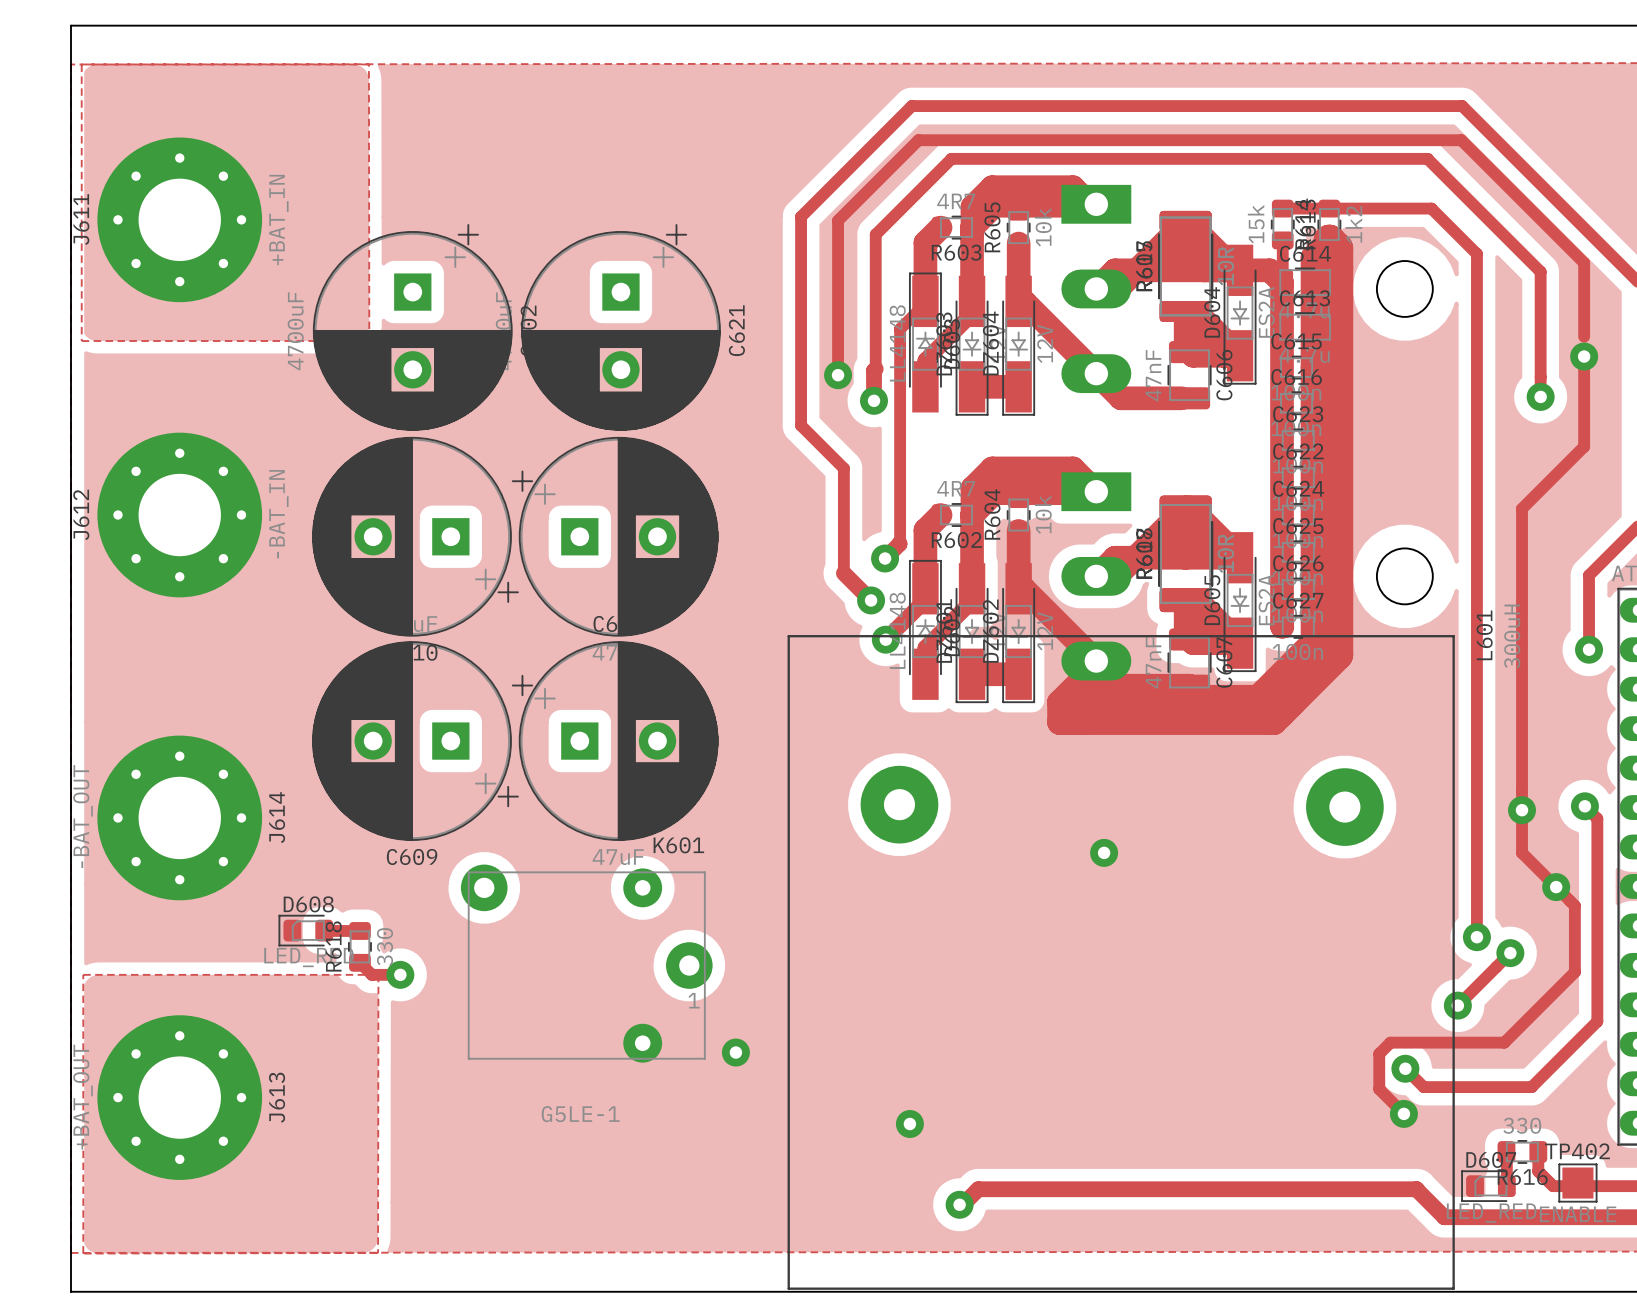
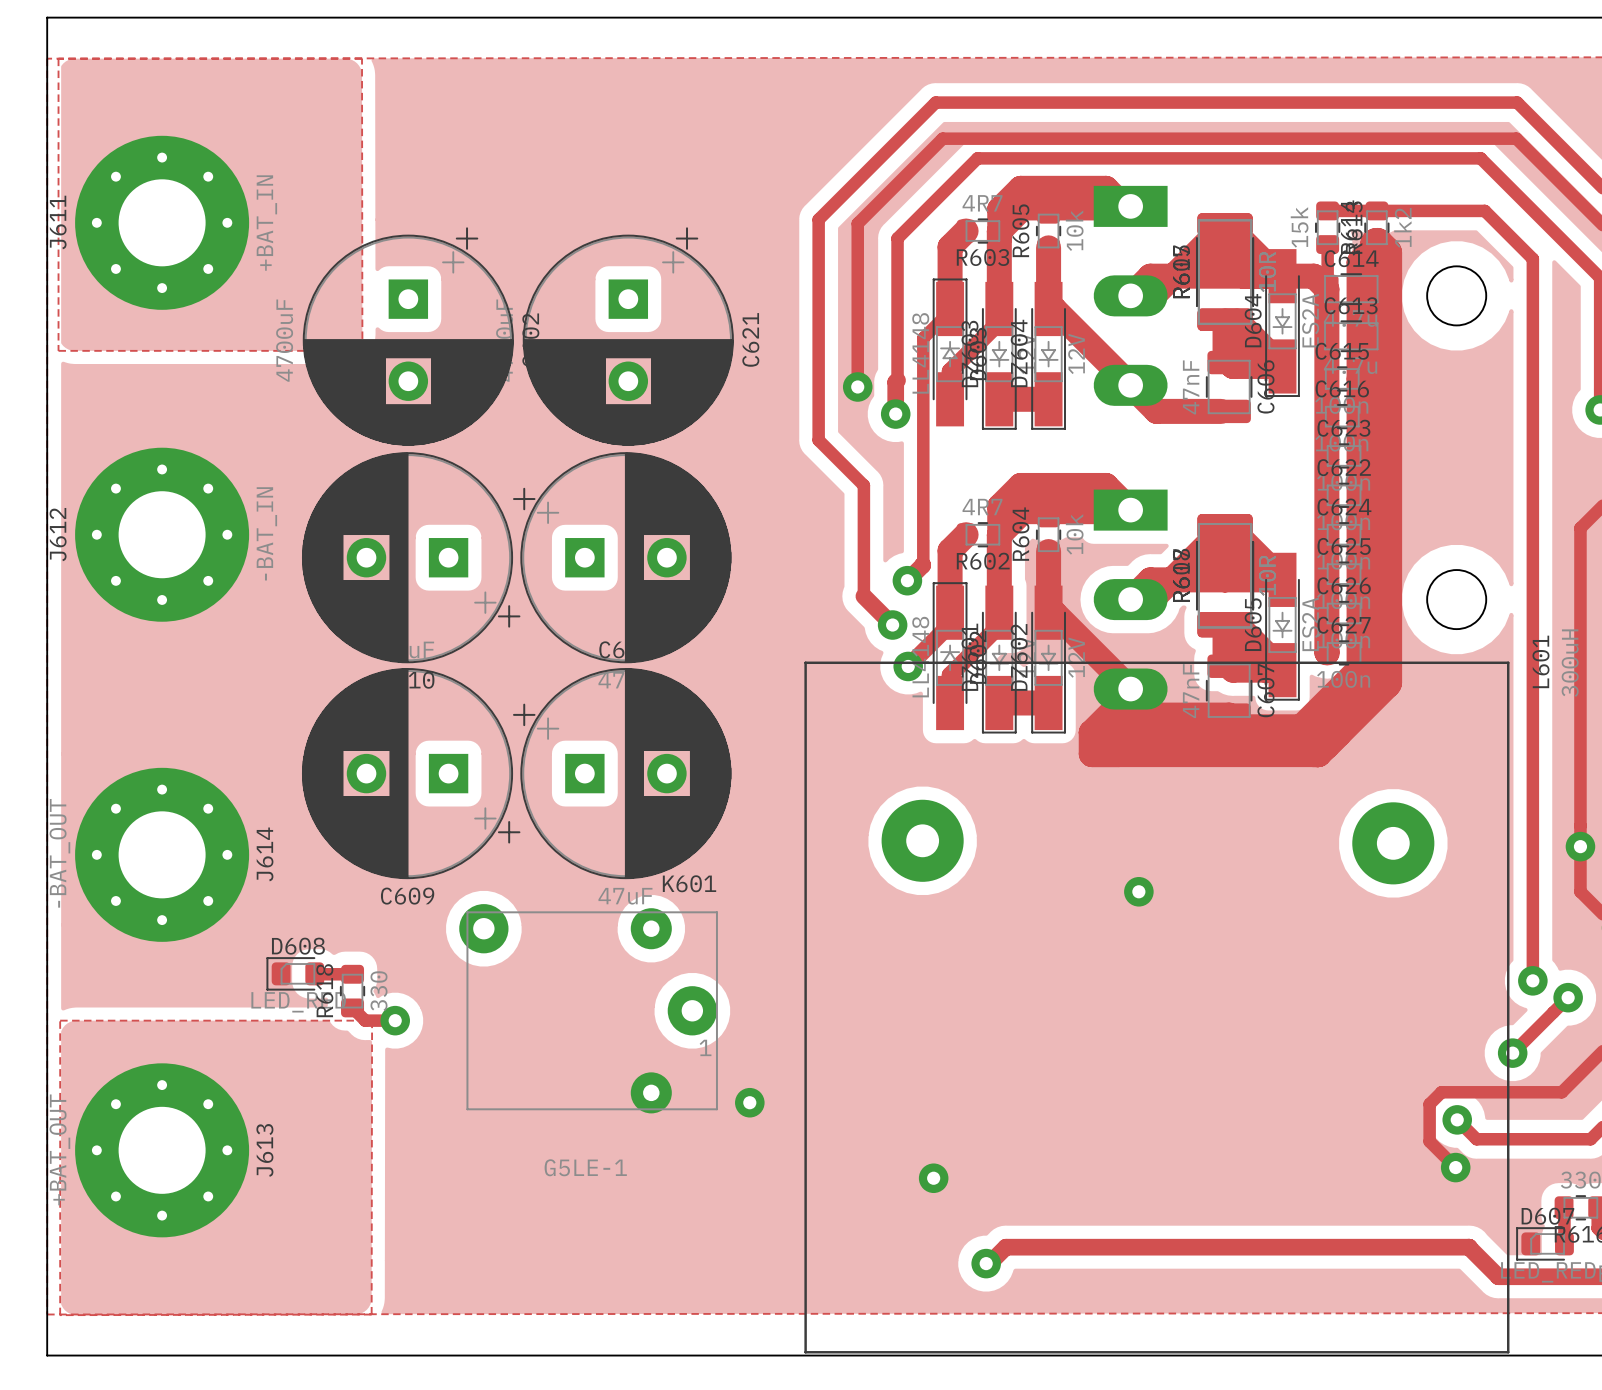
K601 footprint: [460, 864, 713, 1063] -> [459, 904, 718, 1114]

